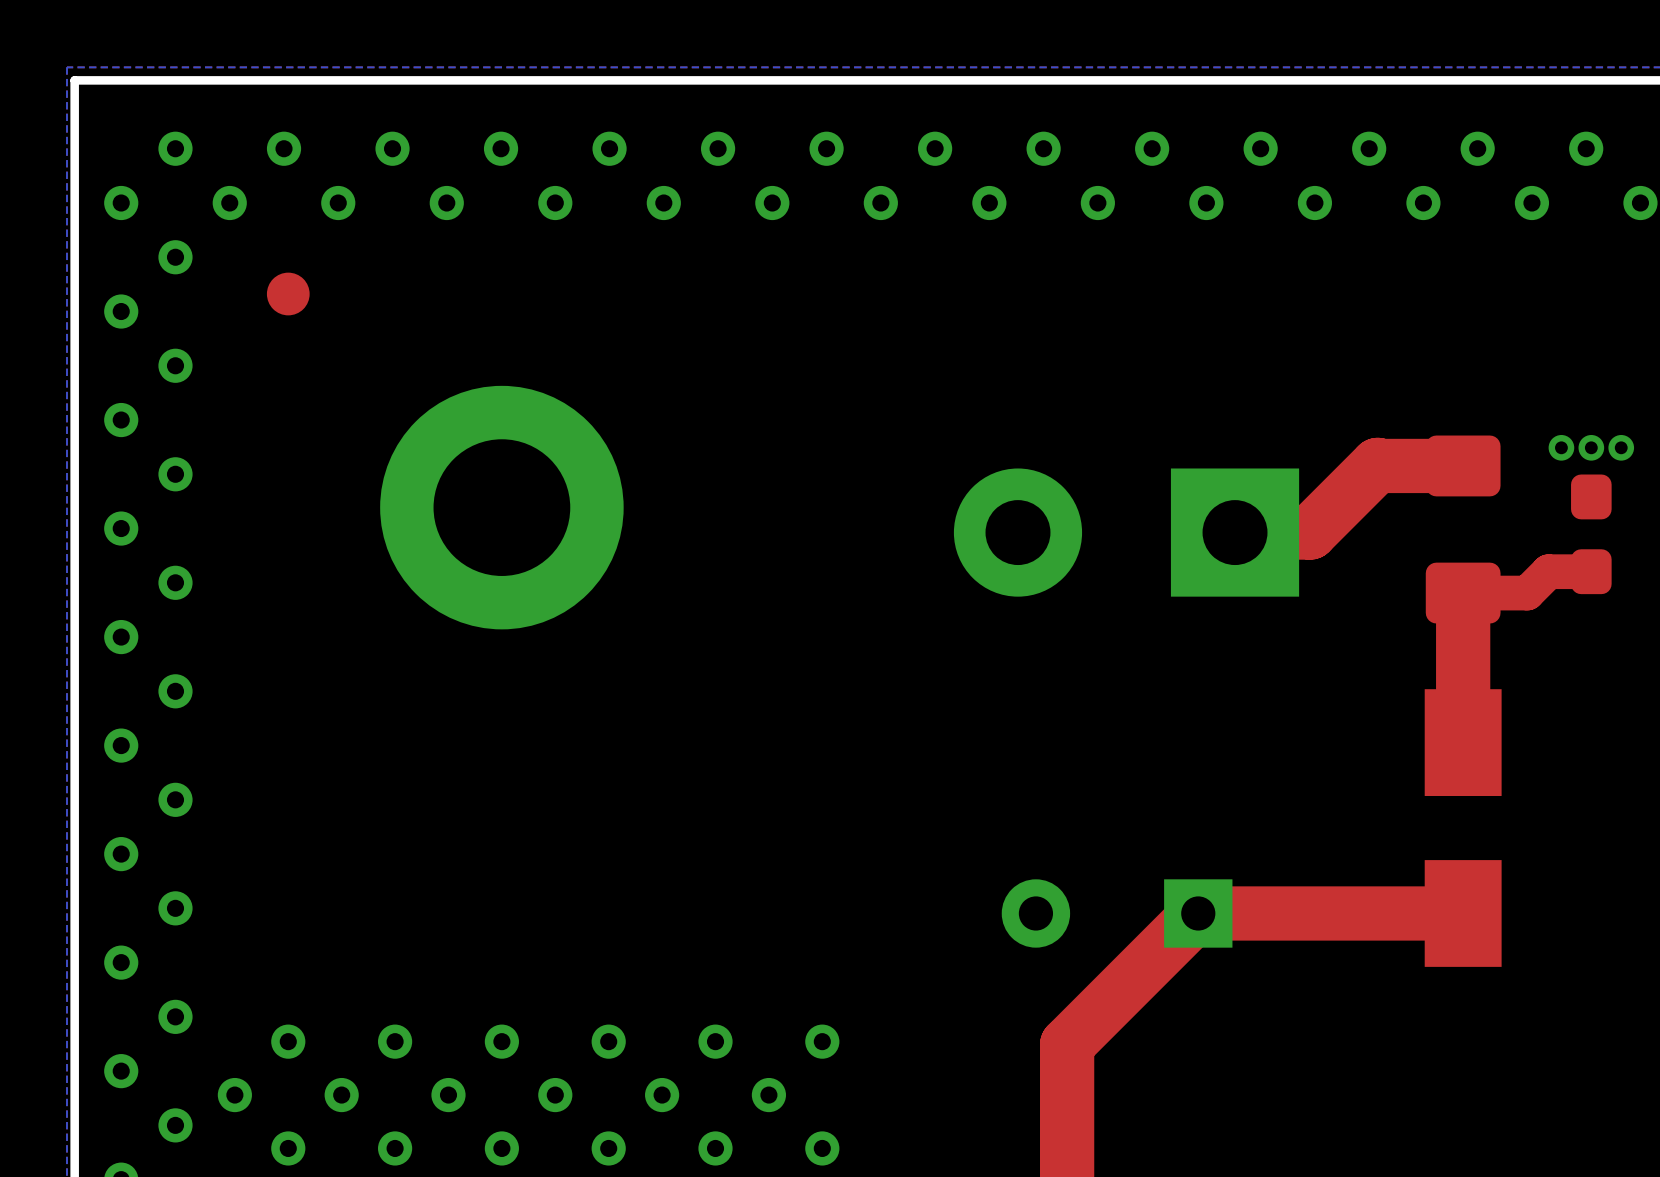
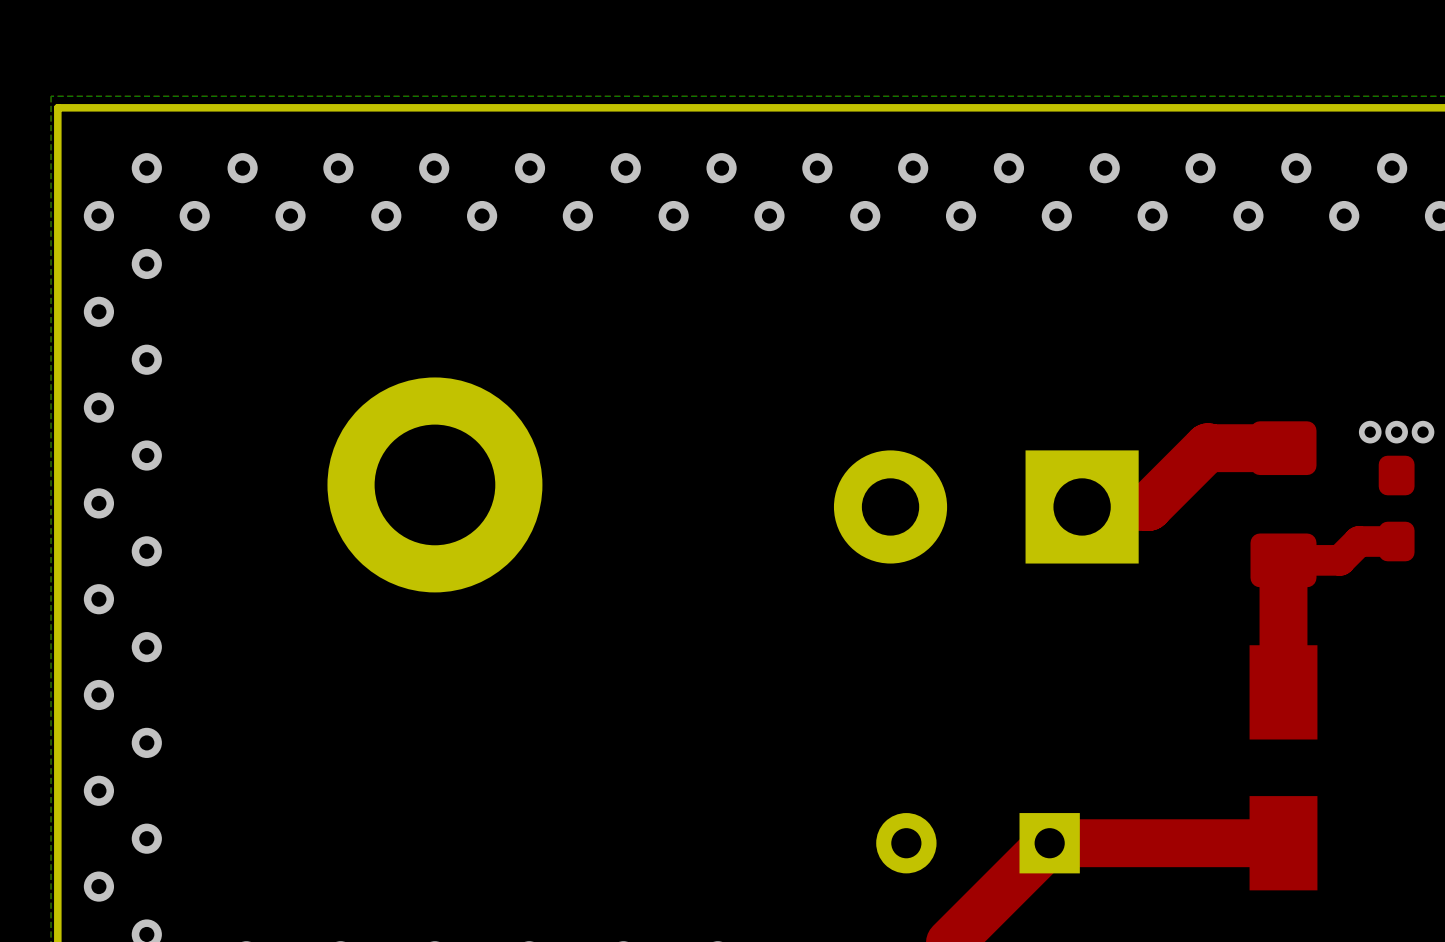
part: (288, 294) -> none

